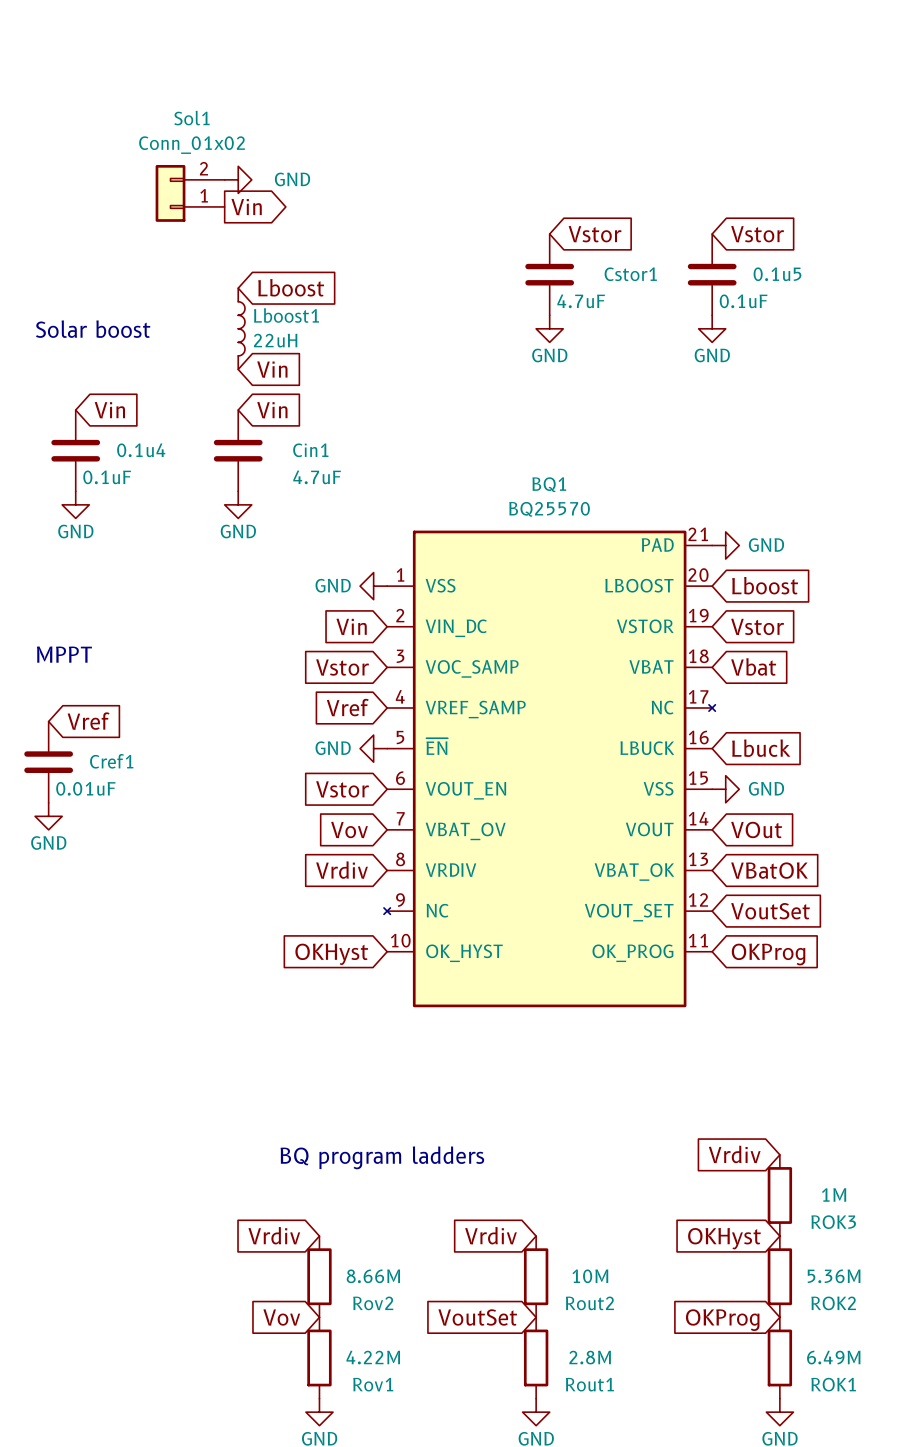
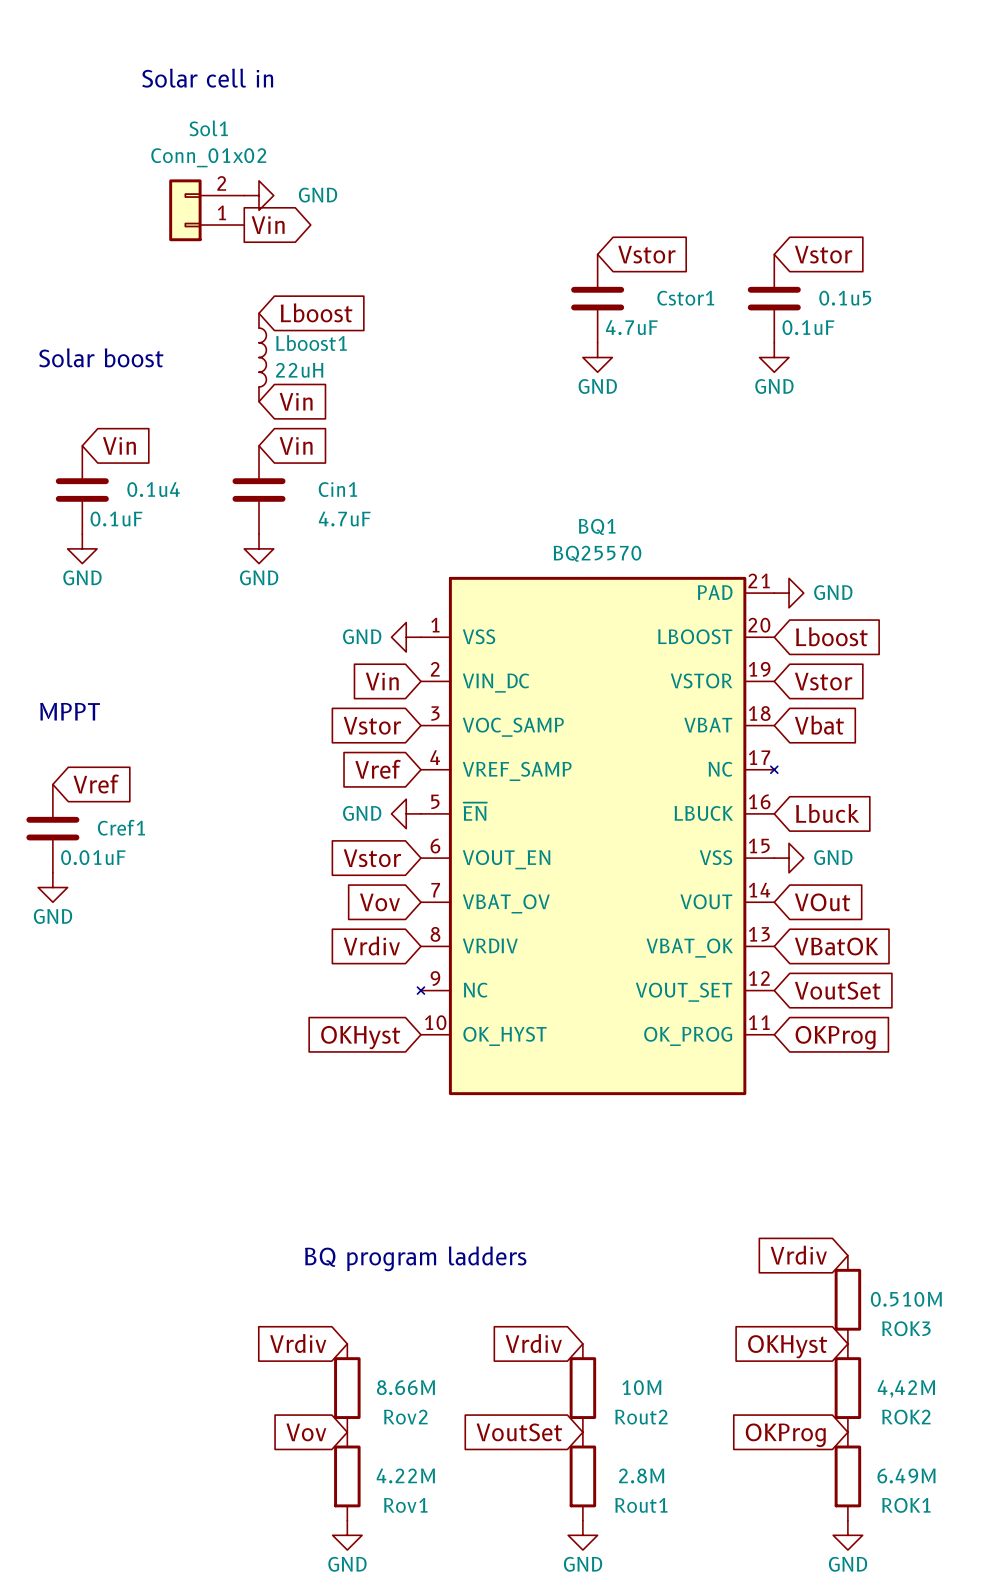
text: none -> Solar cell in (207, 78)
ROK3 value: 1M (834, 1194) -> 0.510M (906, 1299)
ROK2 value: 5.36M (834, 1276) -> 4,42M (906, 1389)

